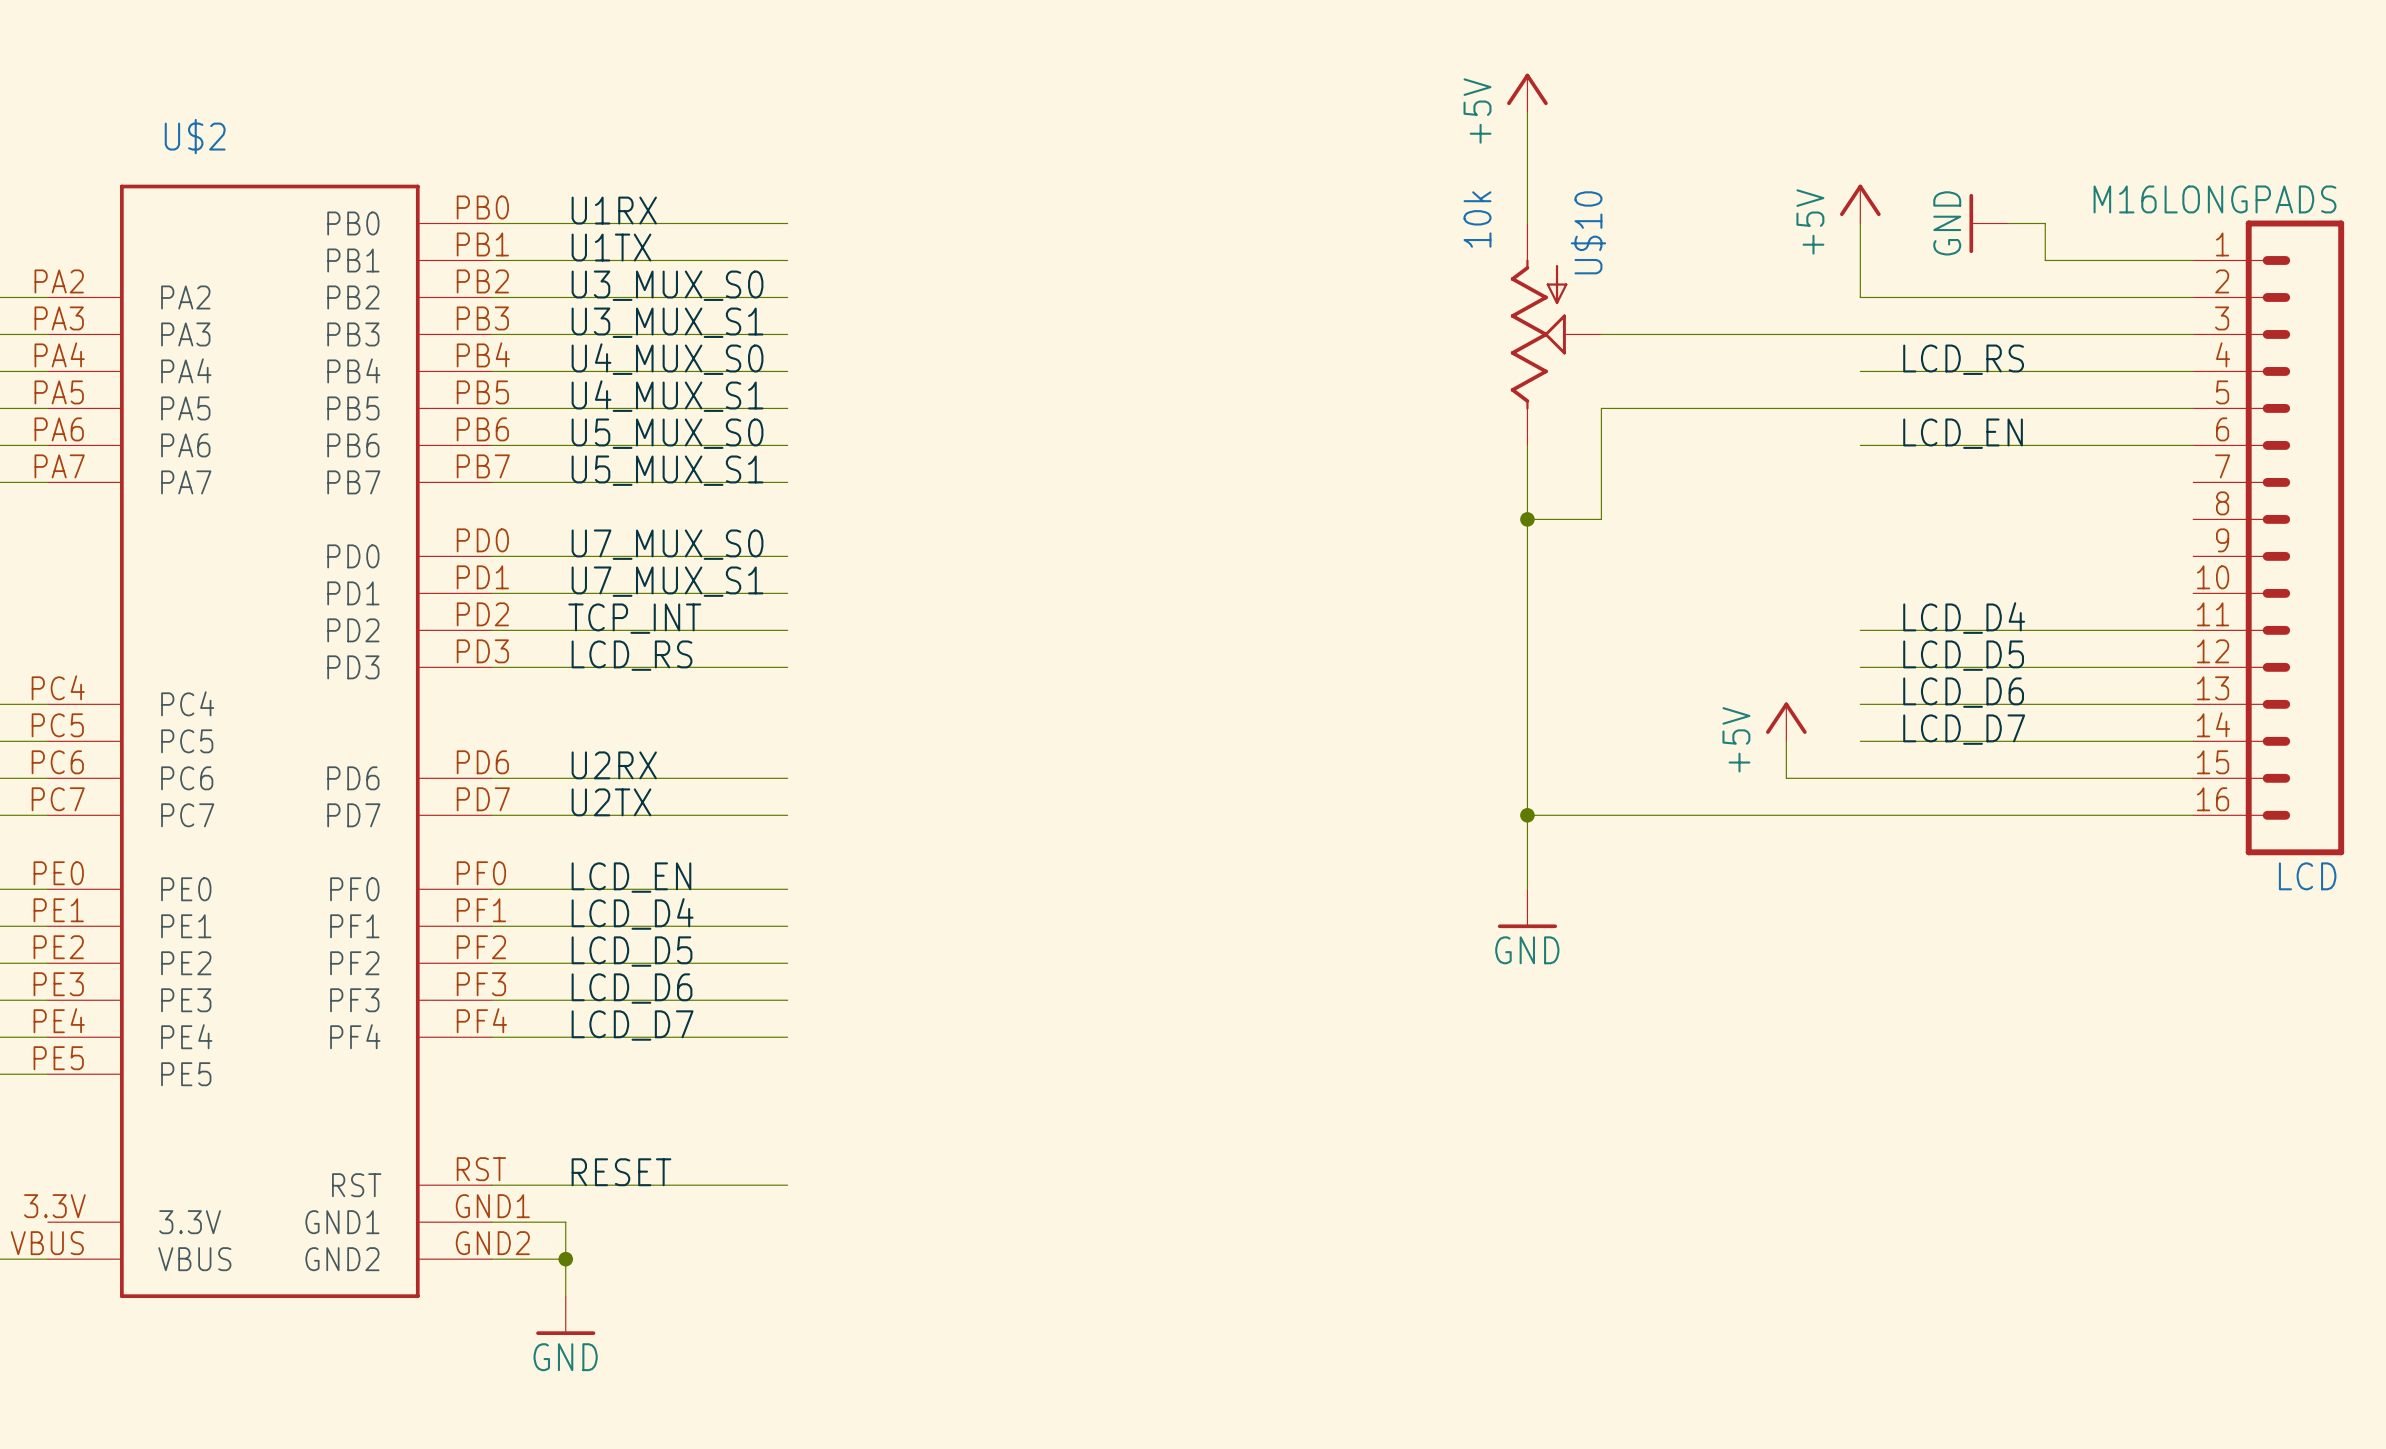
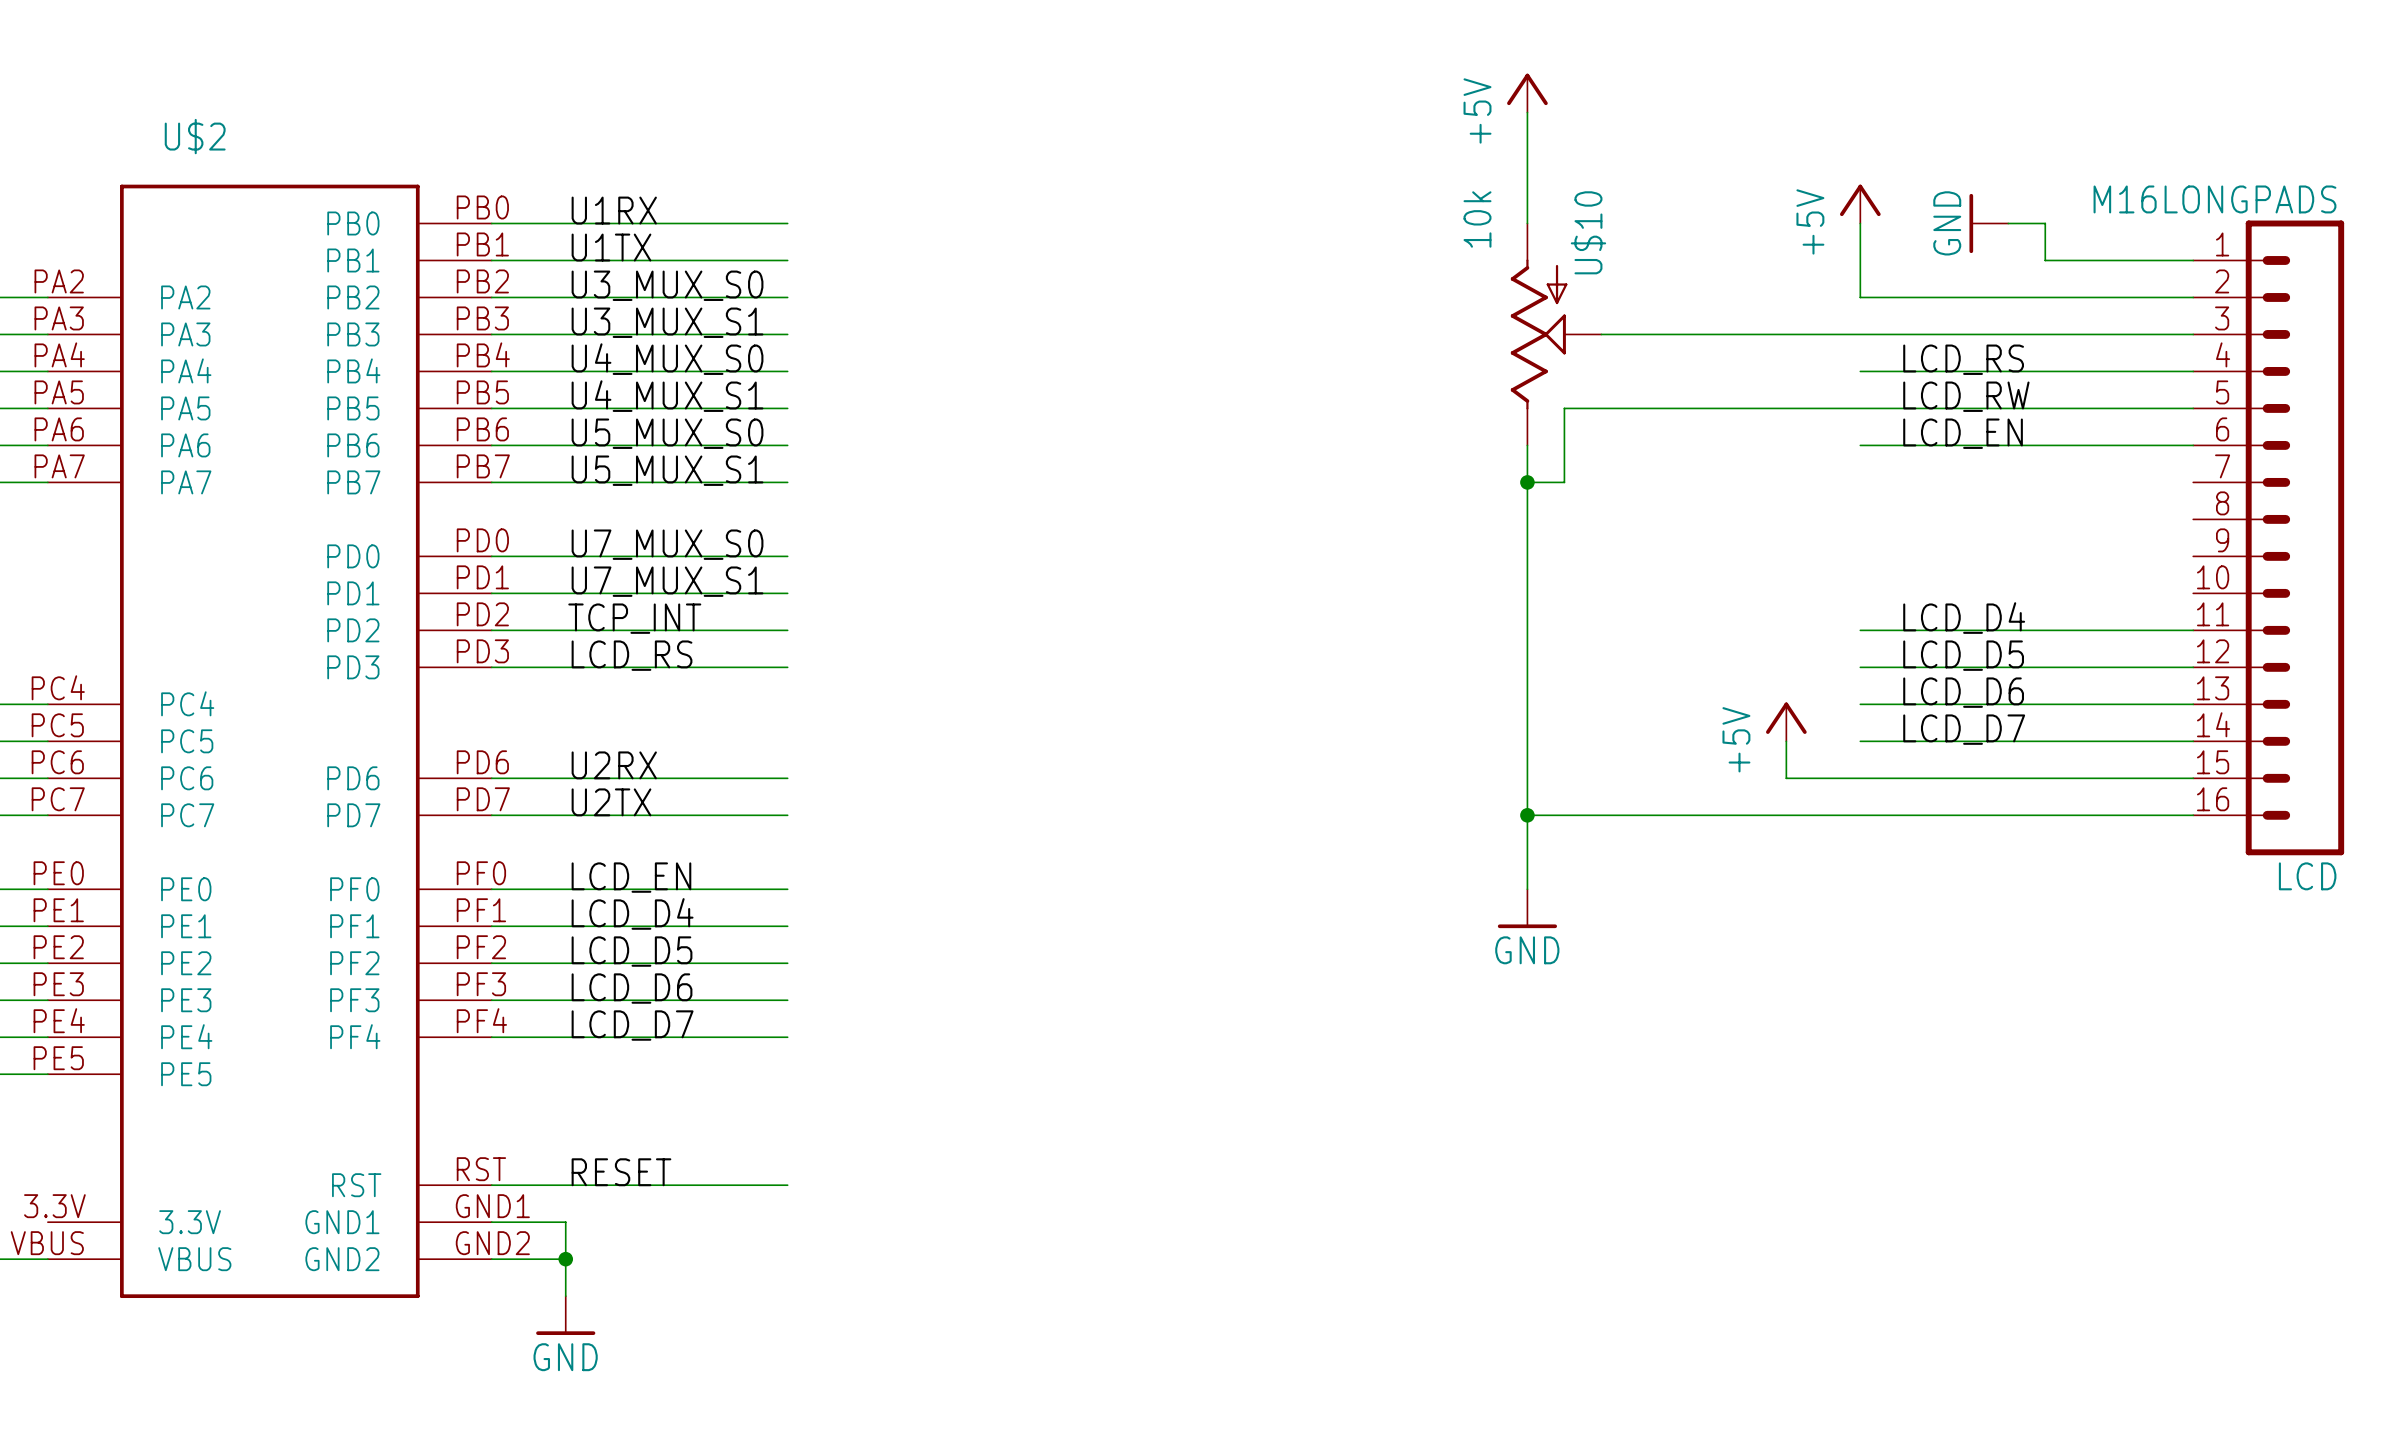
label: none -> LCD_RW (1966, 396)
wire: (1601, 408) (1601, 519) (1527, 519) -> (1601, 408) (1564, 408) (1564, 482) (1527, 482)
junction position: (1527, 519) -> (1527, 482)

